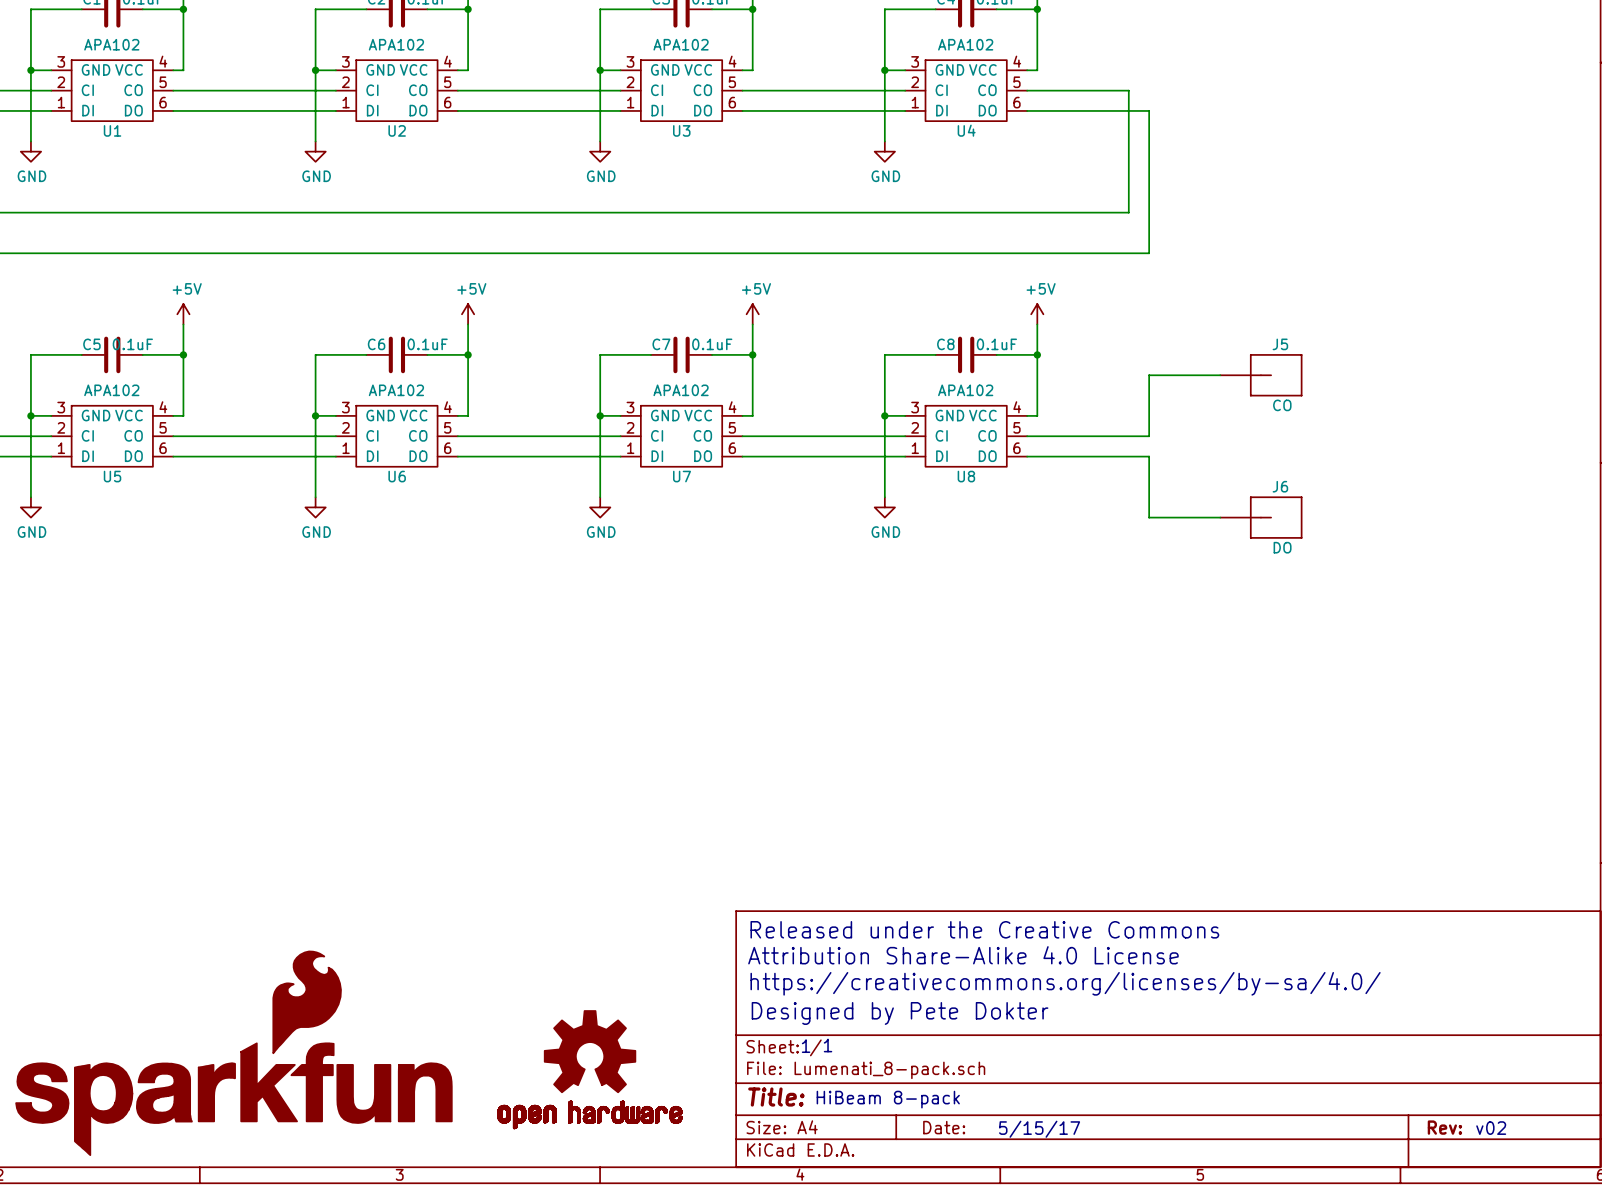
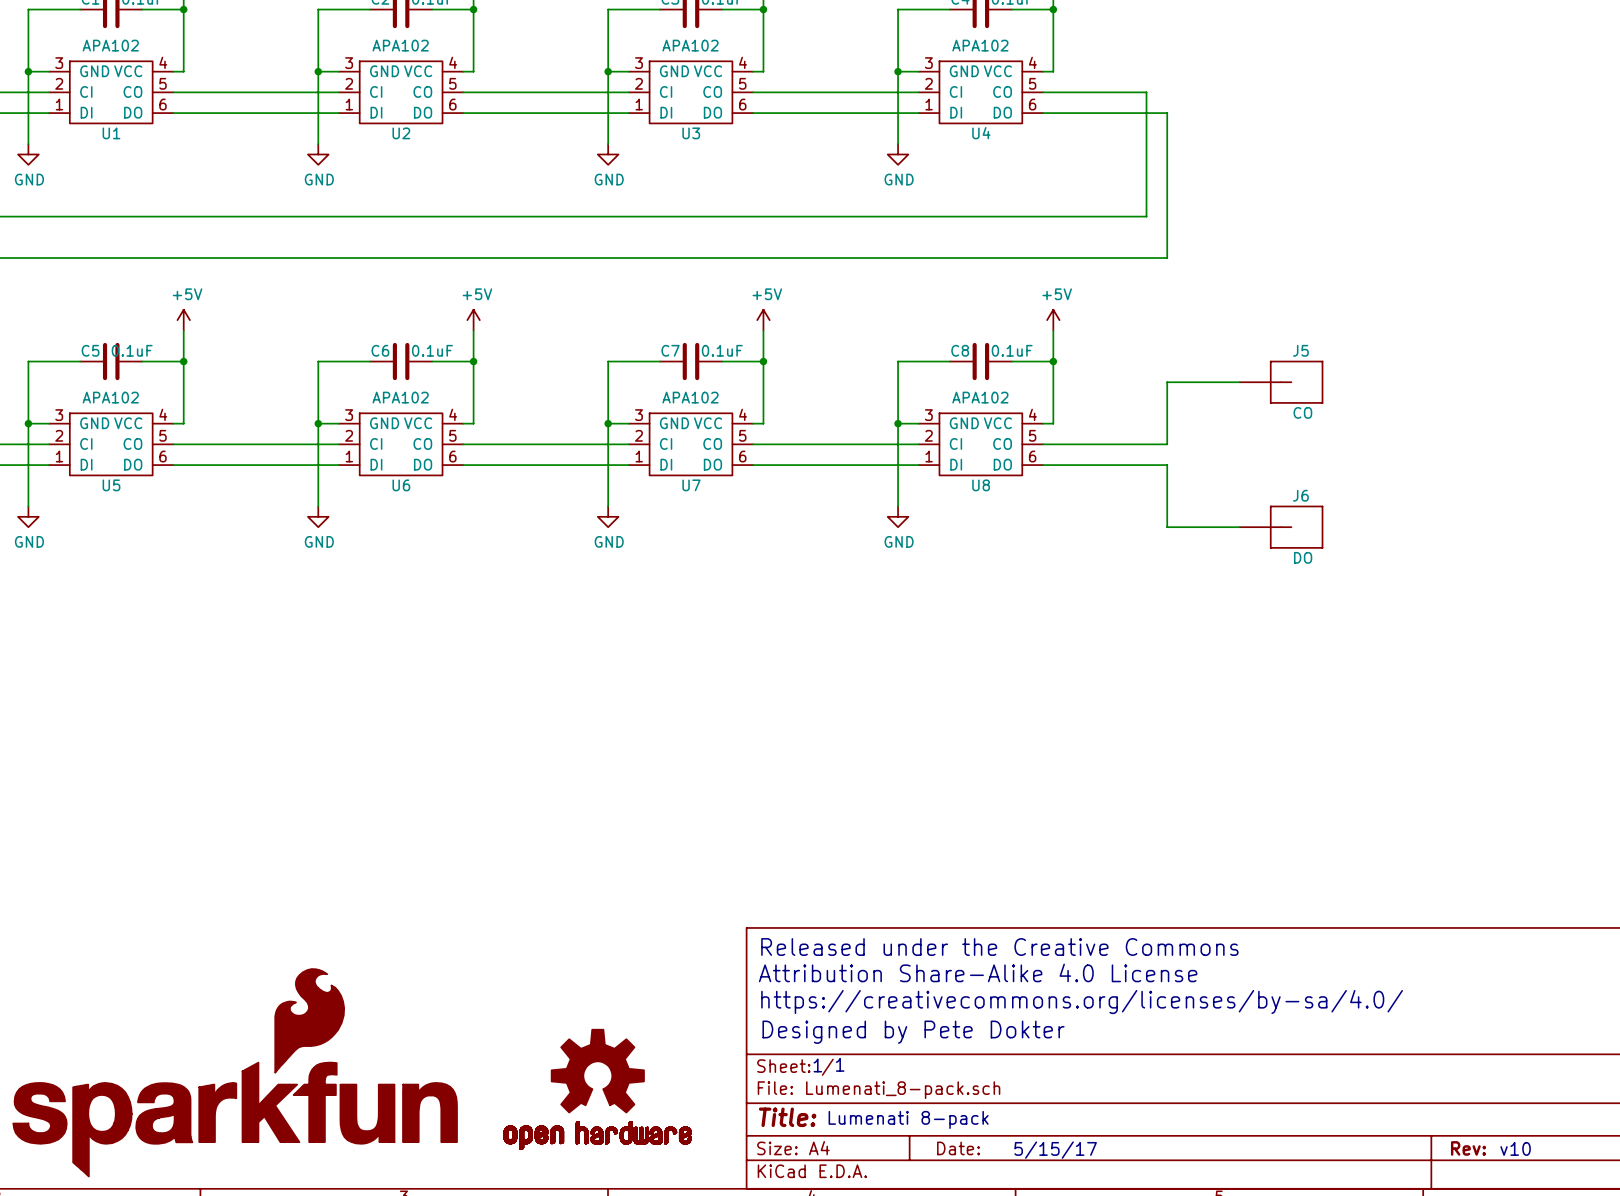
text: HiBeam 8-pack (888, 1099) -> Lumenati 8-pack (908, 1119)
text: v02 (1491, 1128) -> v10 (1515, 1148)

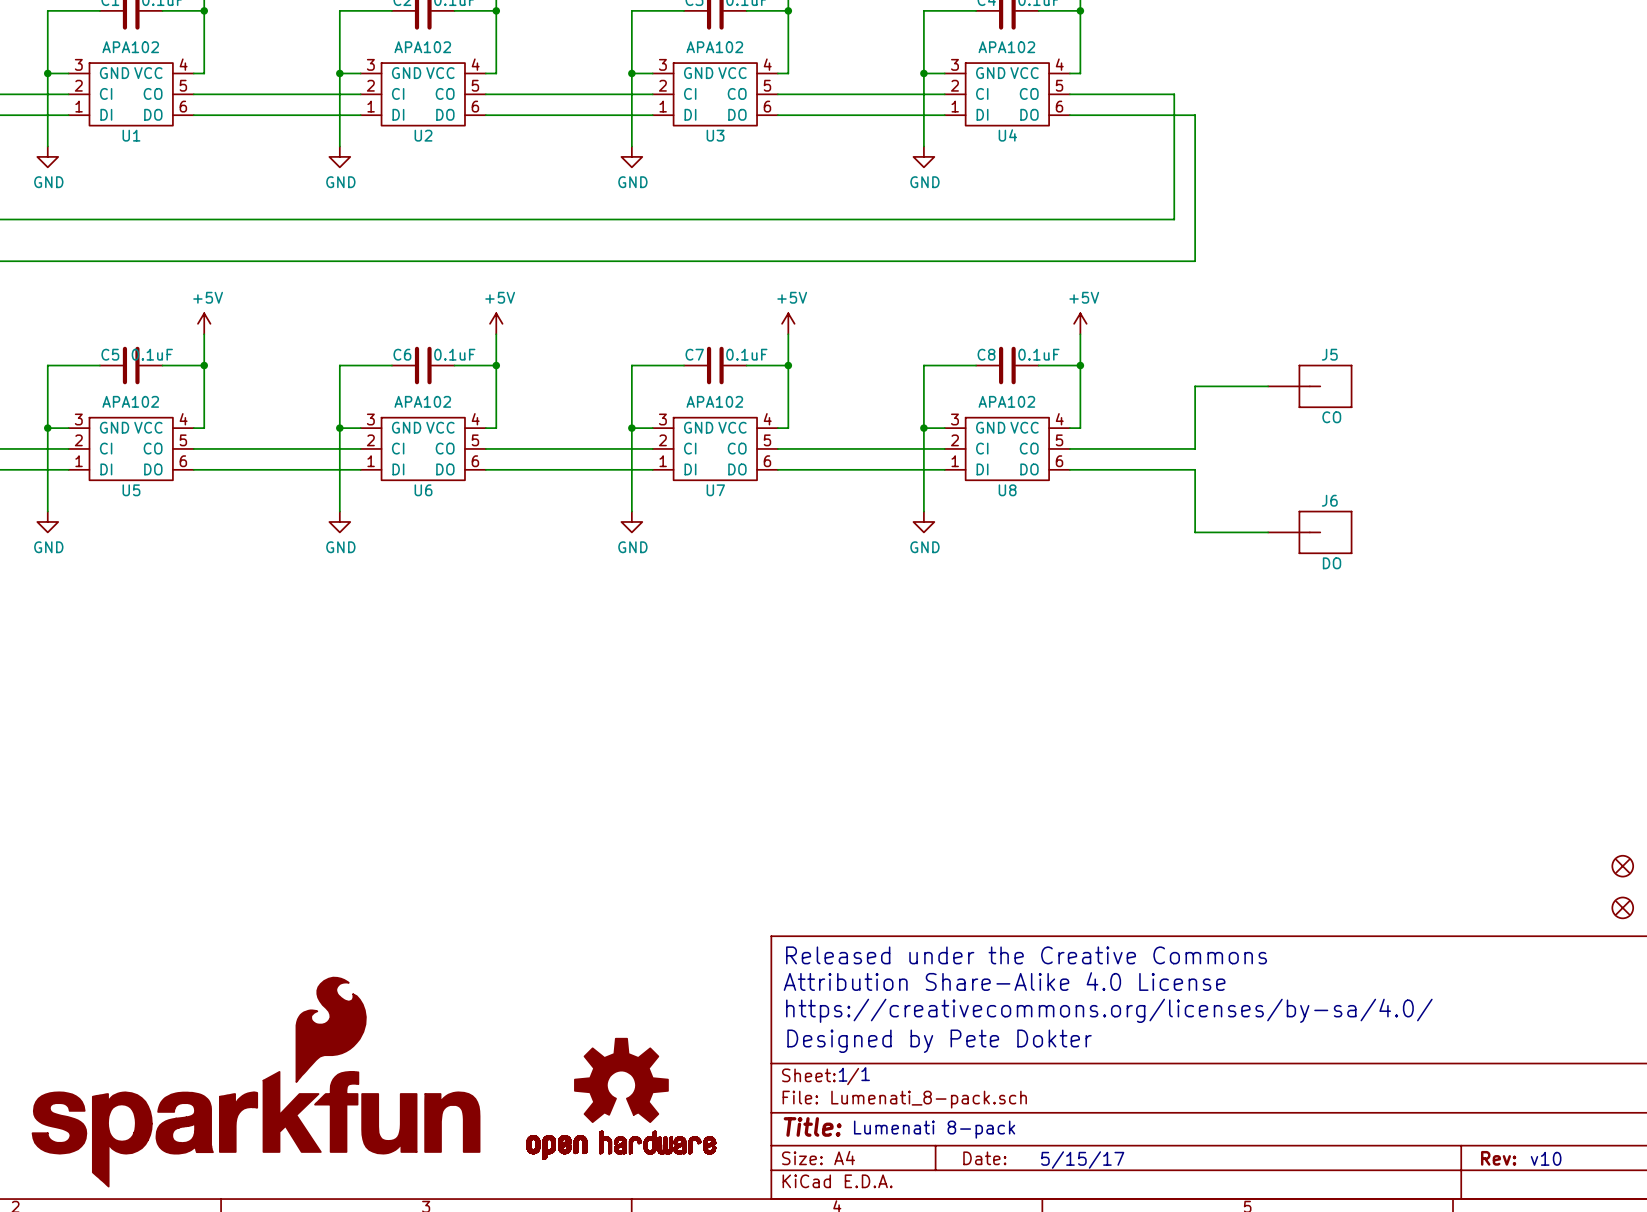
part: none -> (1622, 866)
part: none -> (1622, 907)

